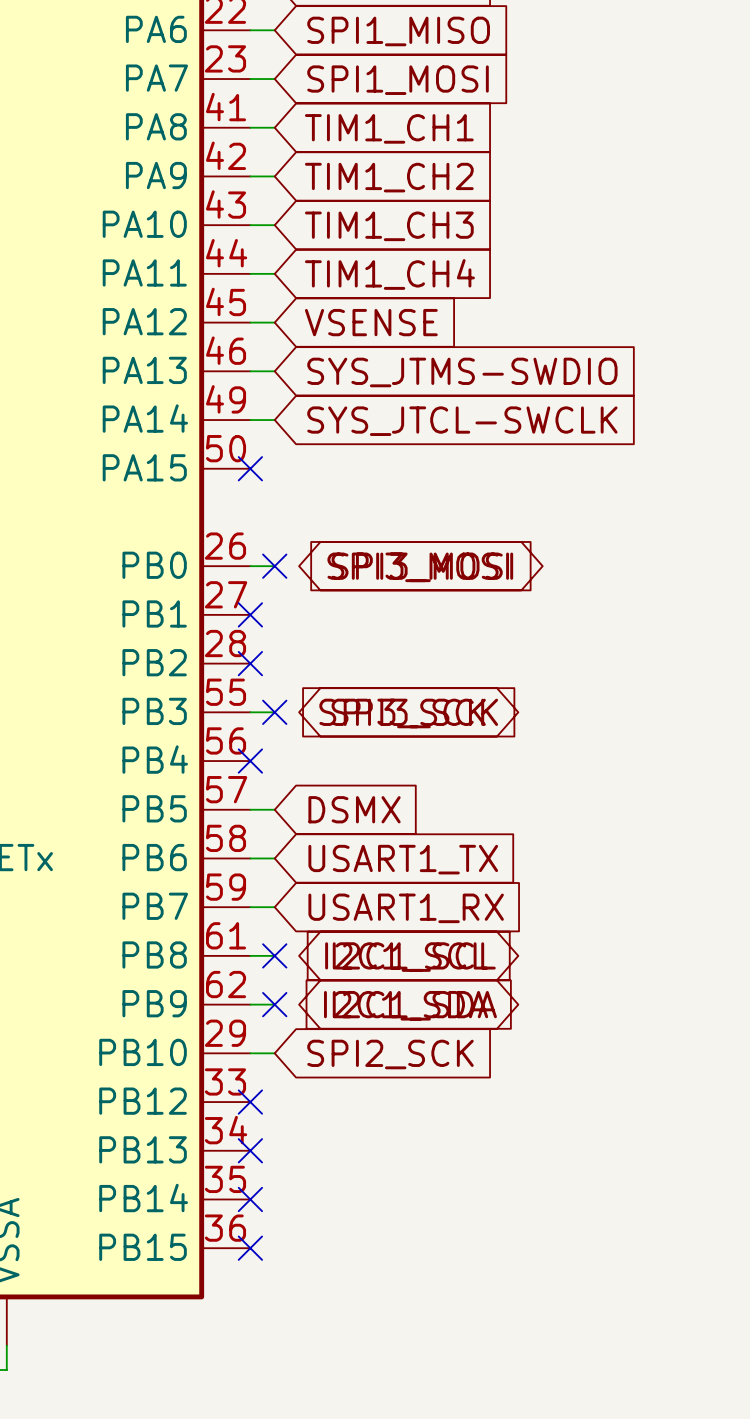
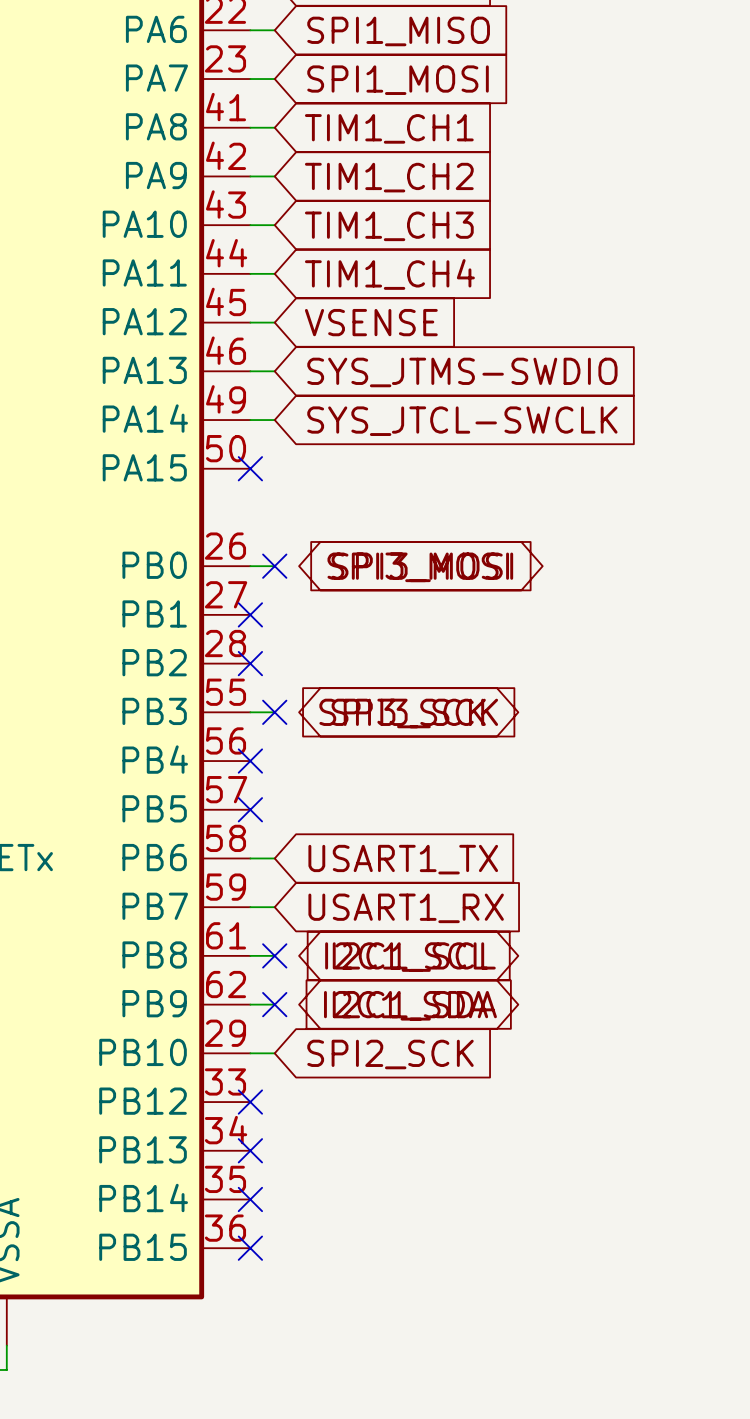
wire: (250, 809) (274, 809) -> none
no-connect mark: none -> (250, 809)
global label: DSMX (354, 809) -> none

